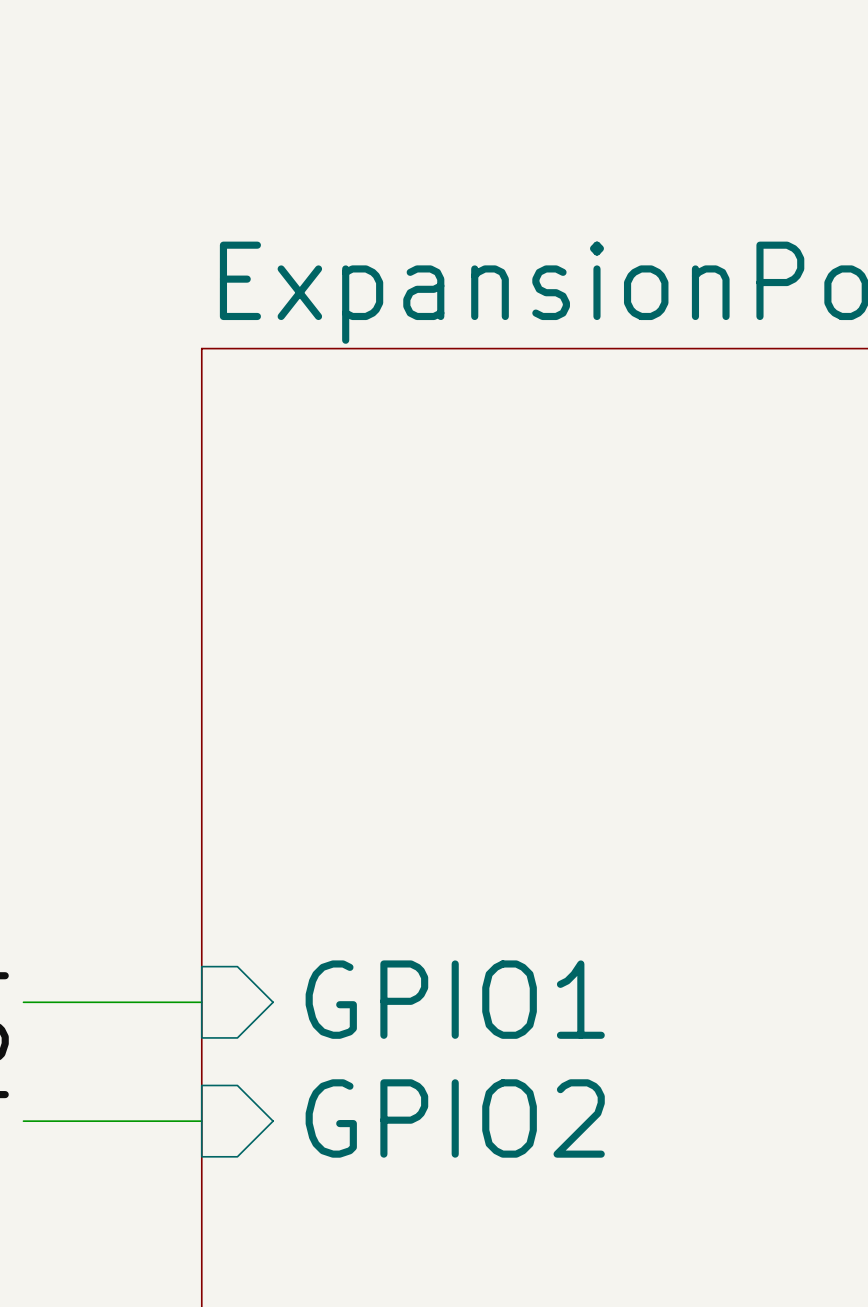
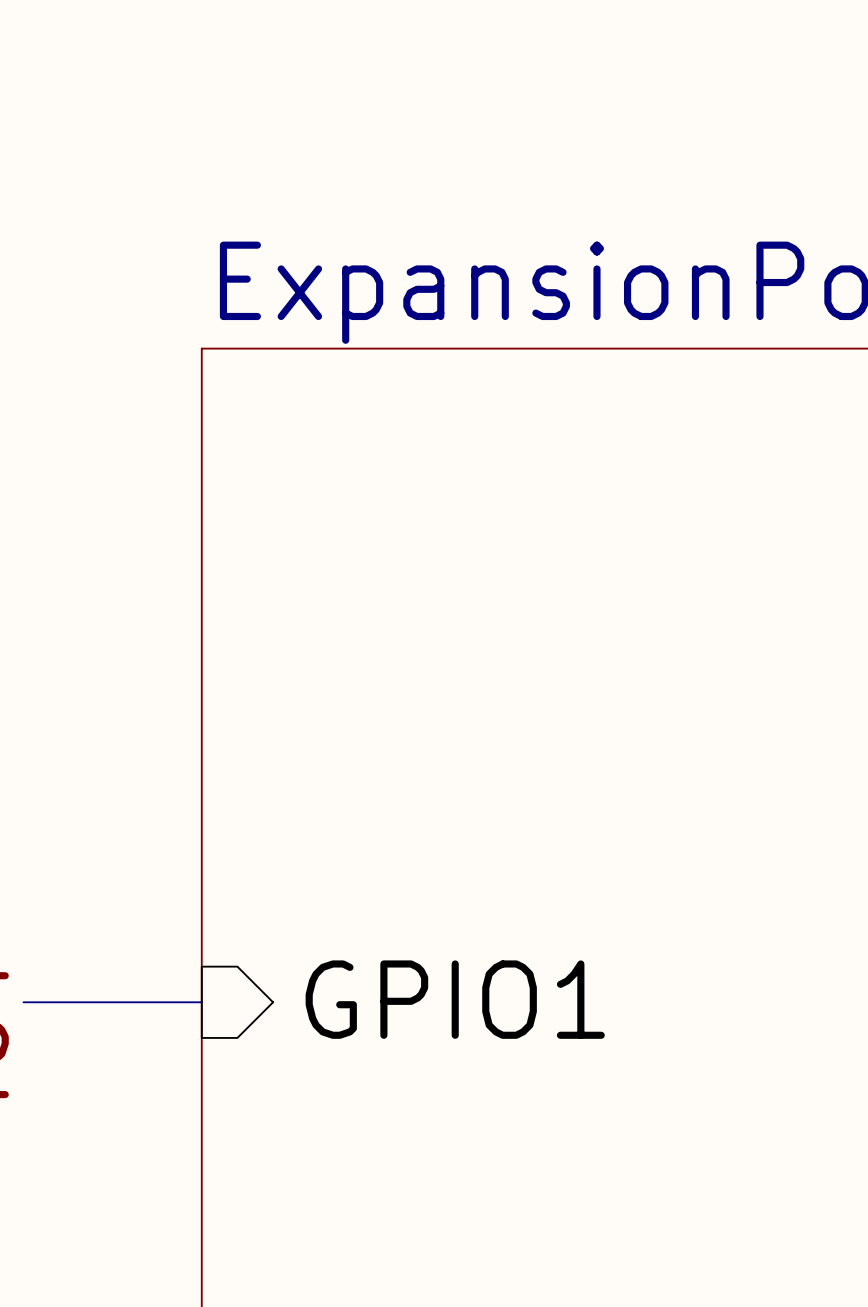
sheet pin: GPIO2 (455, 1118) -> none
wire: (23, 1121) (201, 1121) -> none

